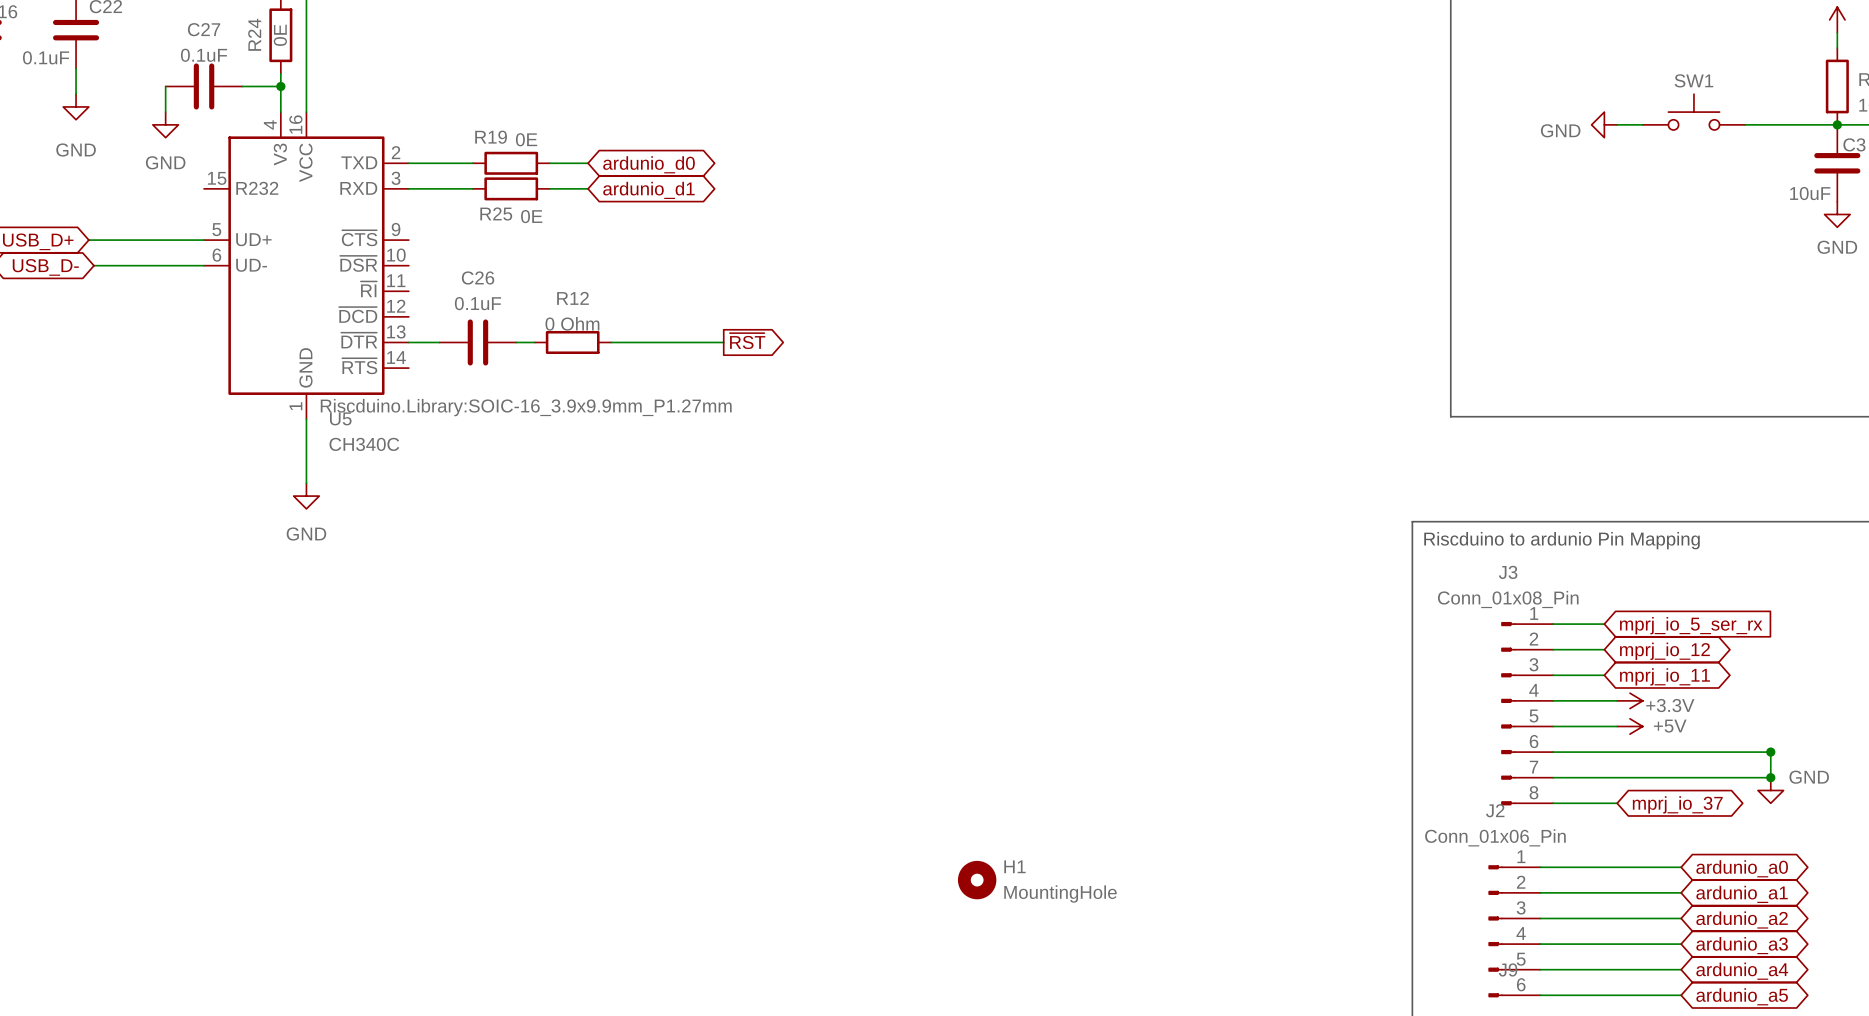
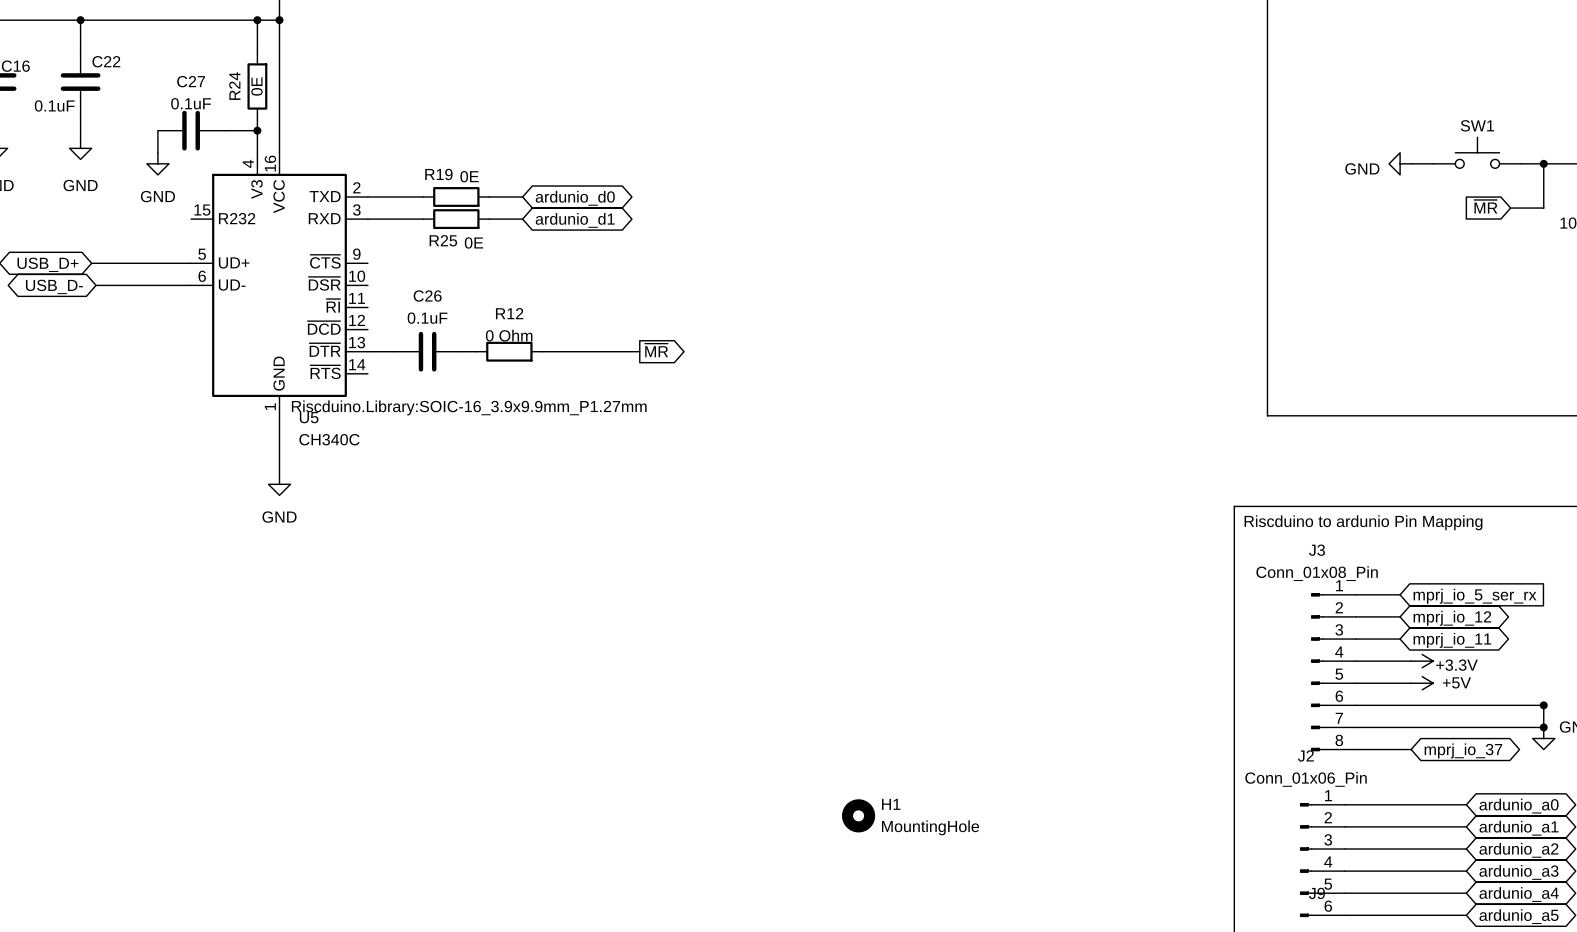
wire: none -> (1543, 163) (1543, 208) (1510, 208)
junction: none -> (1543, 163)
global label: none -> ~{MR} (1485, 206)
global label: ~{RST} (747, 341) -> ~{MR} (656, 350)

